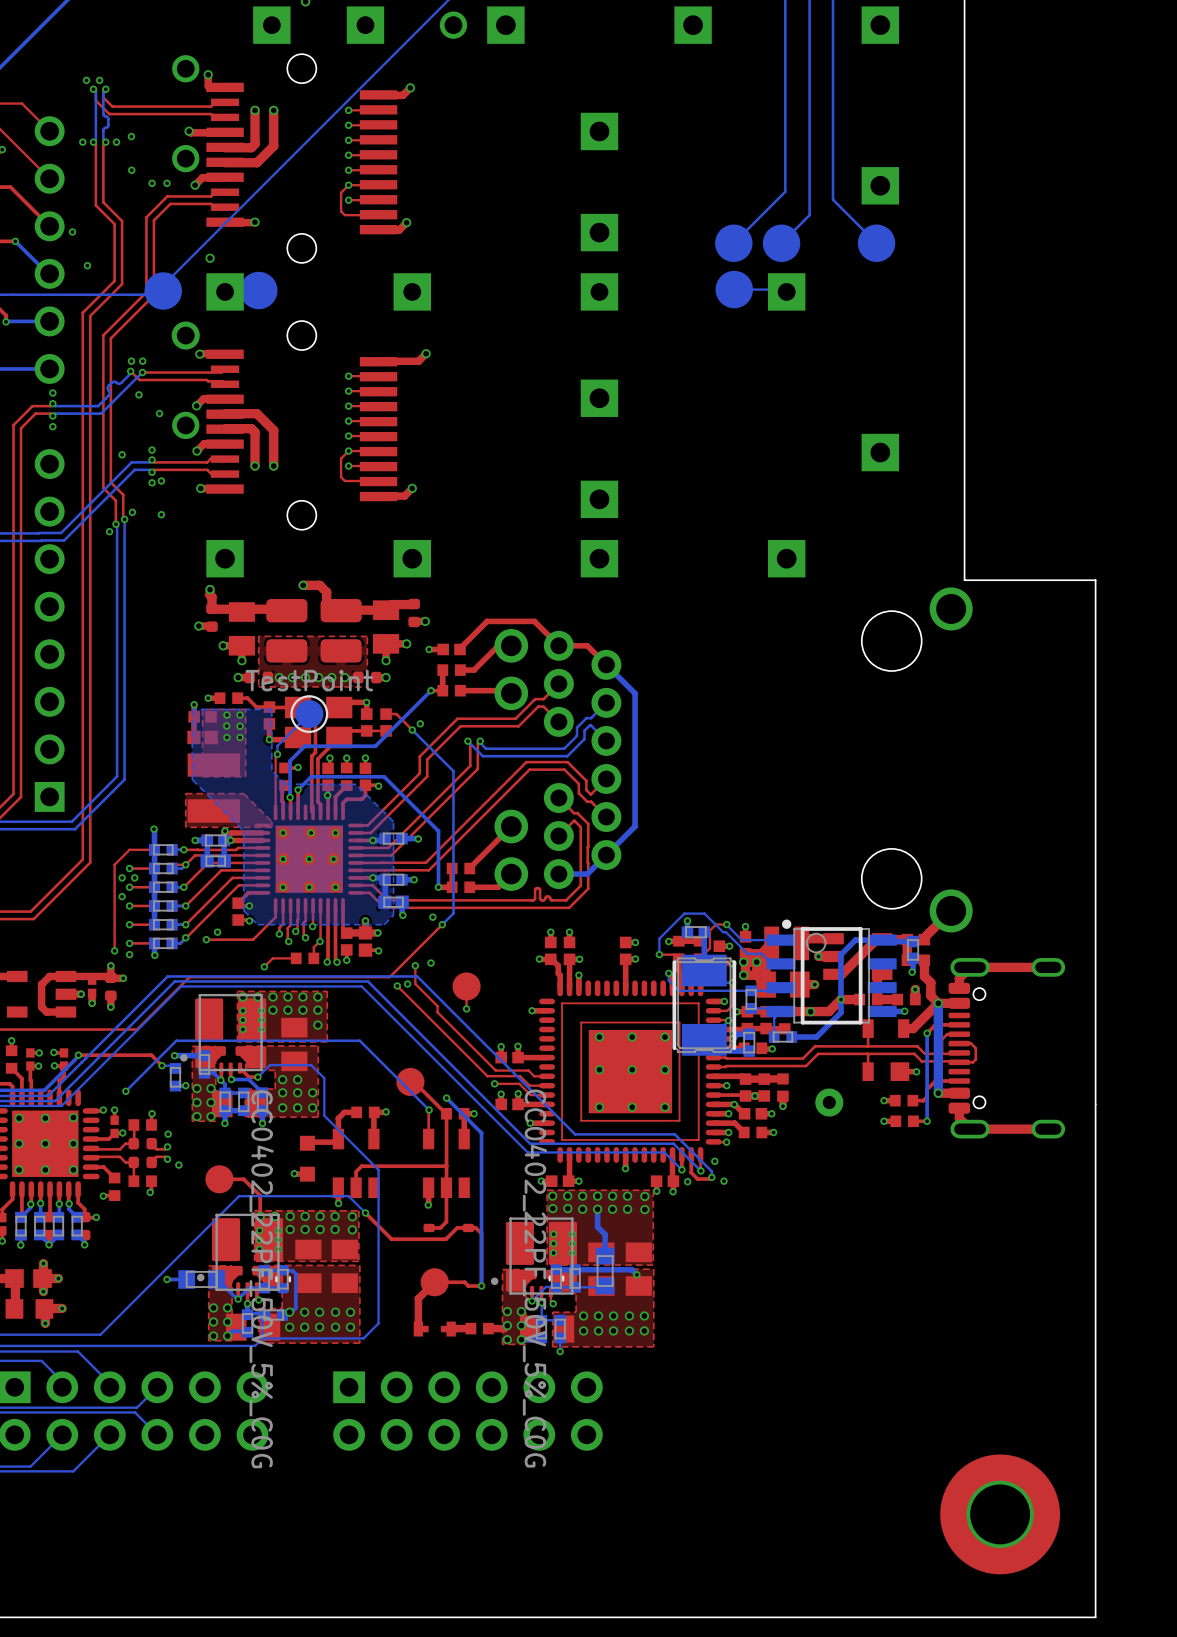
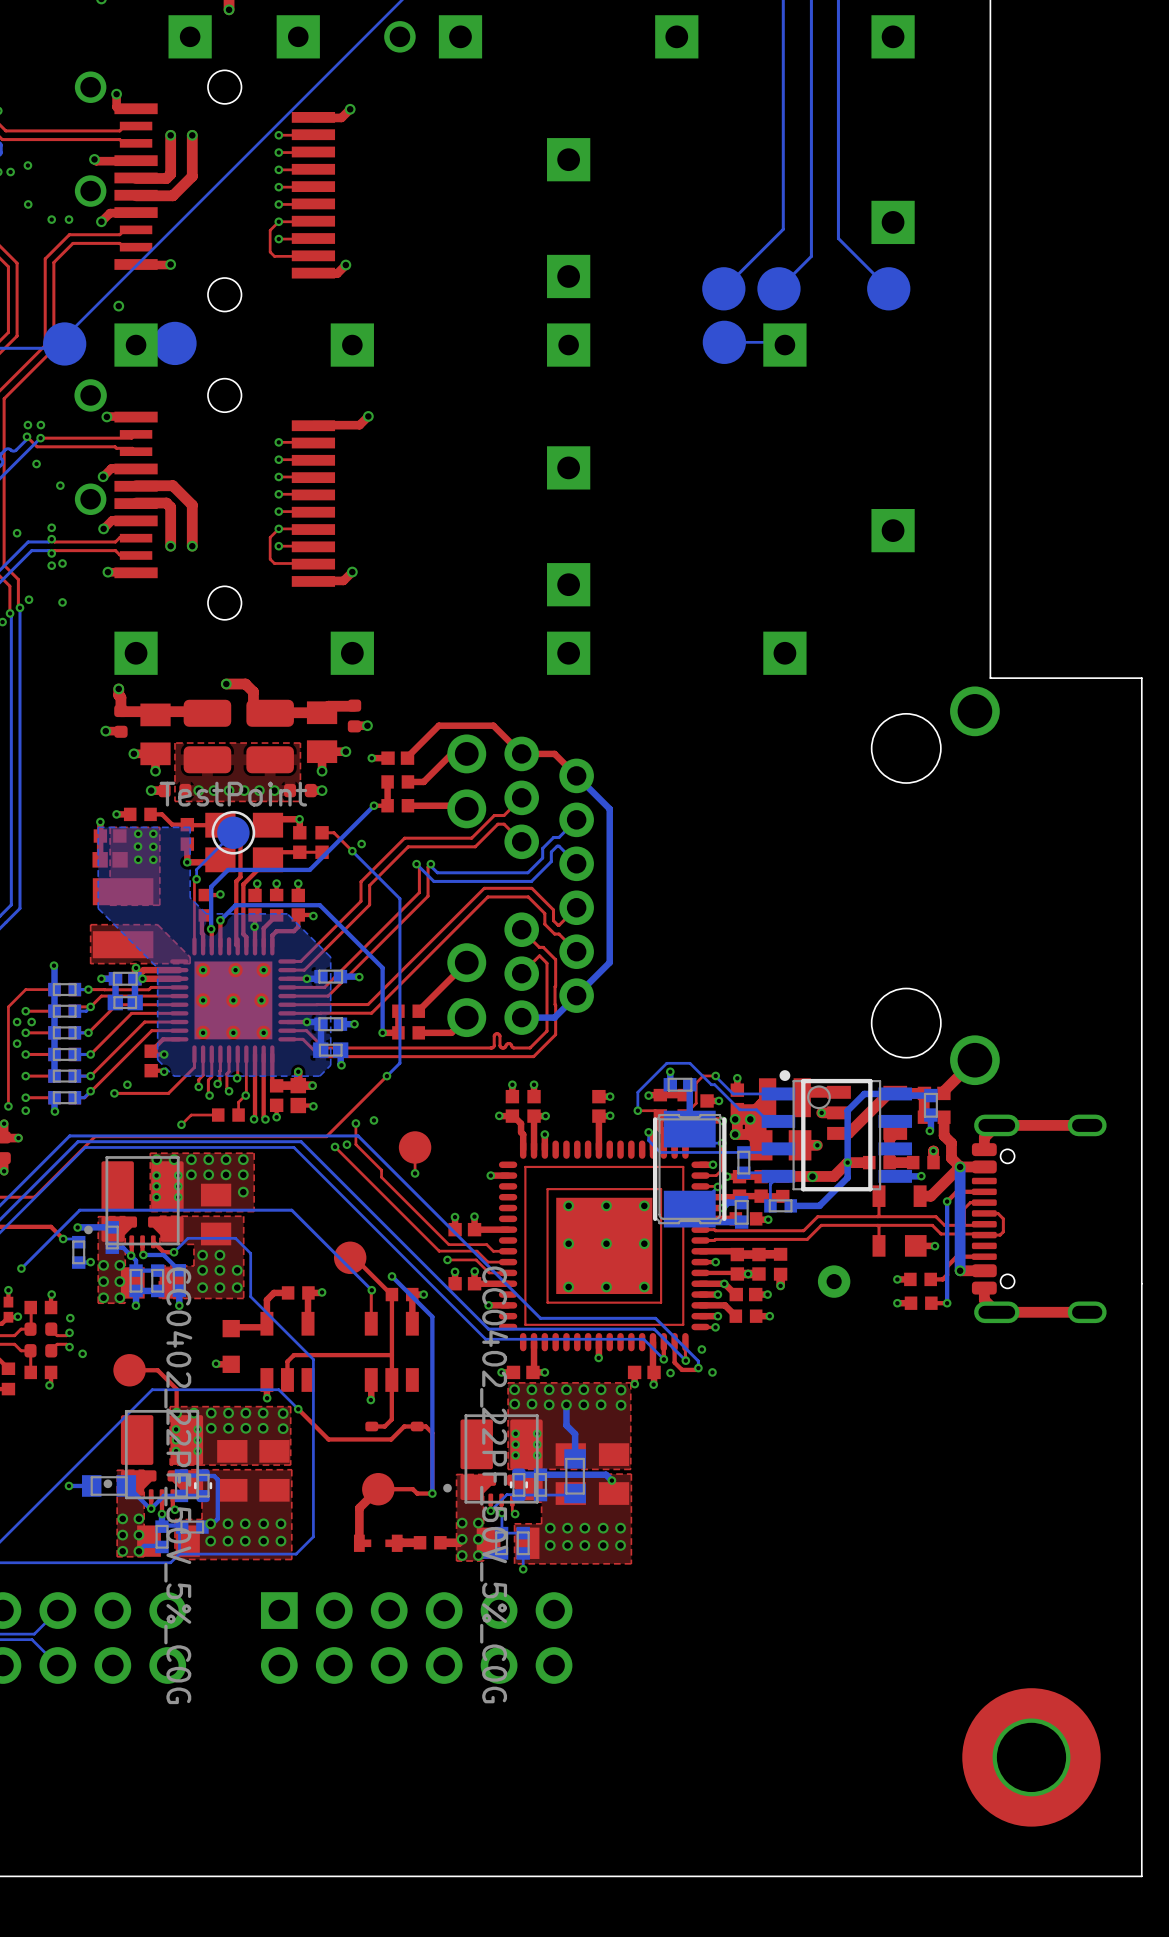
via: (432, 917) -> none

